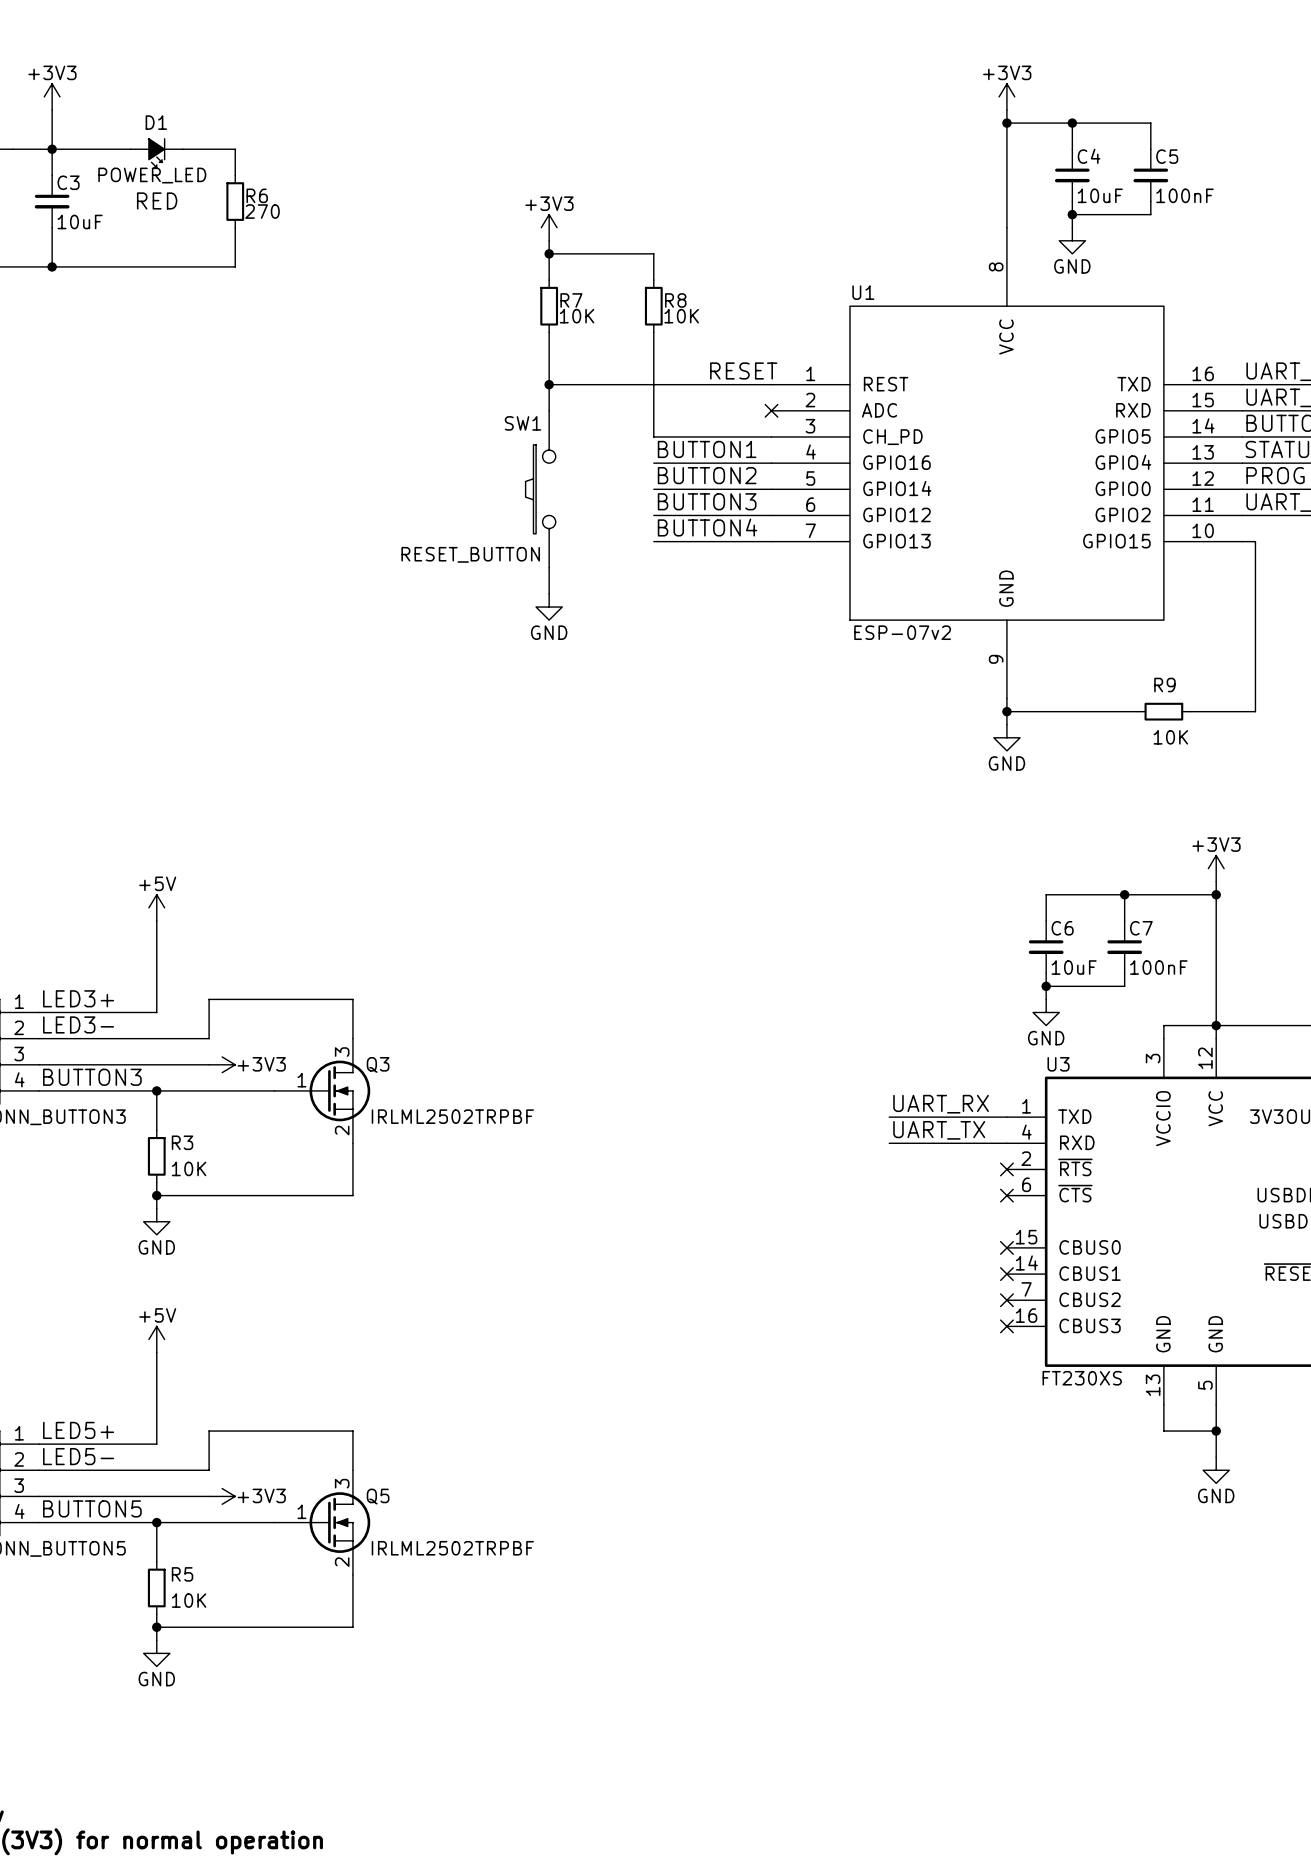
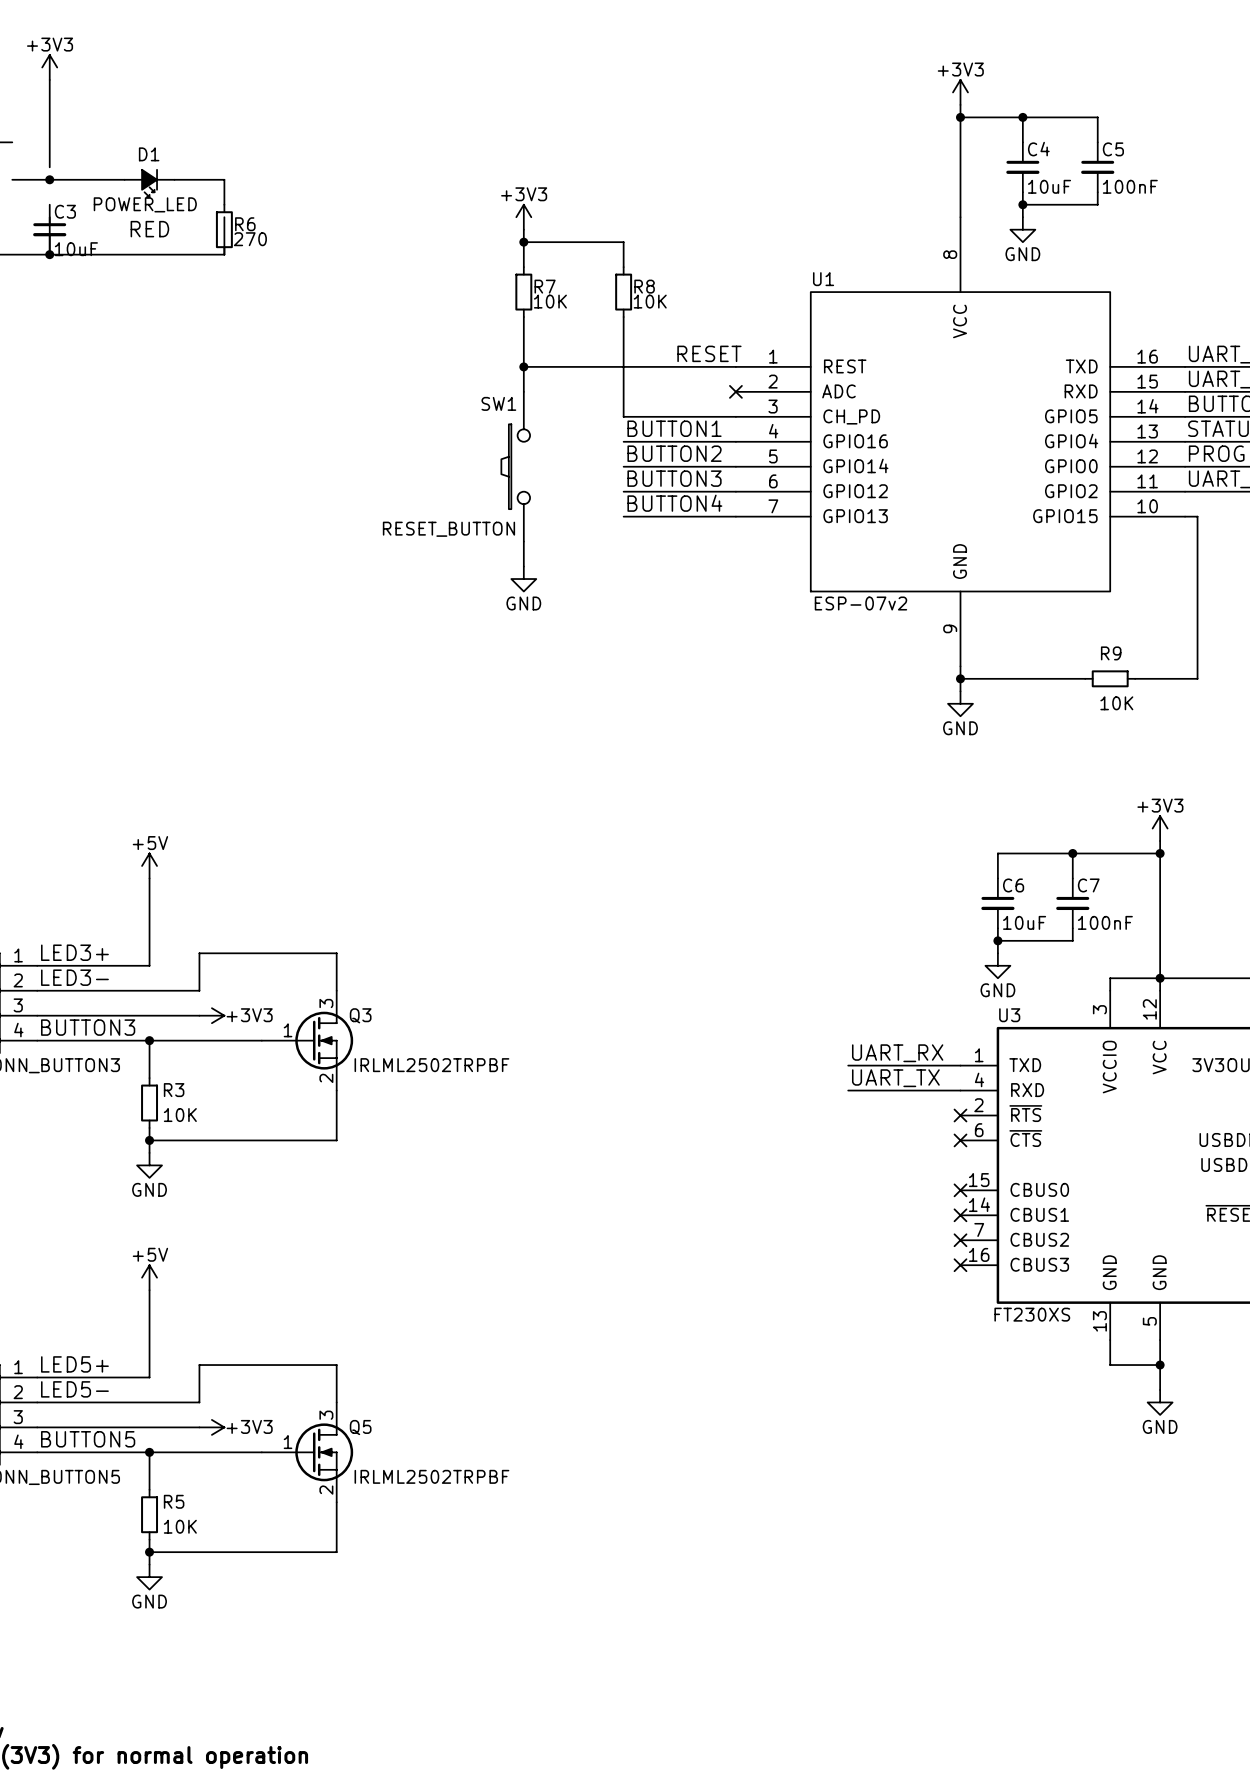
power symbol position: +3V3 (52, 96) -> +3V3 (49, 67)
wire: (12, 149) (130, 149) -> (12, 179) (124, 179)
junction position: (52, 149) -> (49, 179)
wire: (182, 149) (235, 149) (235, 175) -> (174, 179) (224, 179) (224, 204)
D1 position: (156, 153) -> (149, 183)
C3 position: (52, 201) -> (49, 229)
R6 position: (235, 201) -> (224, 229)

